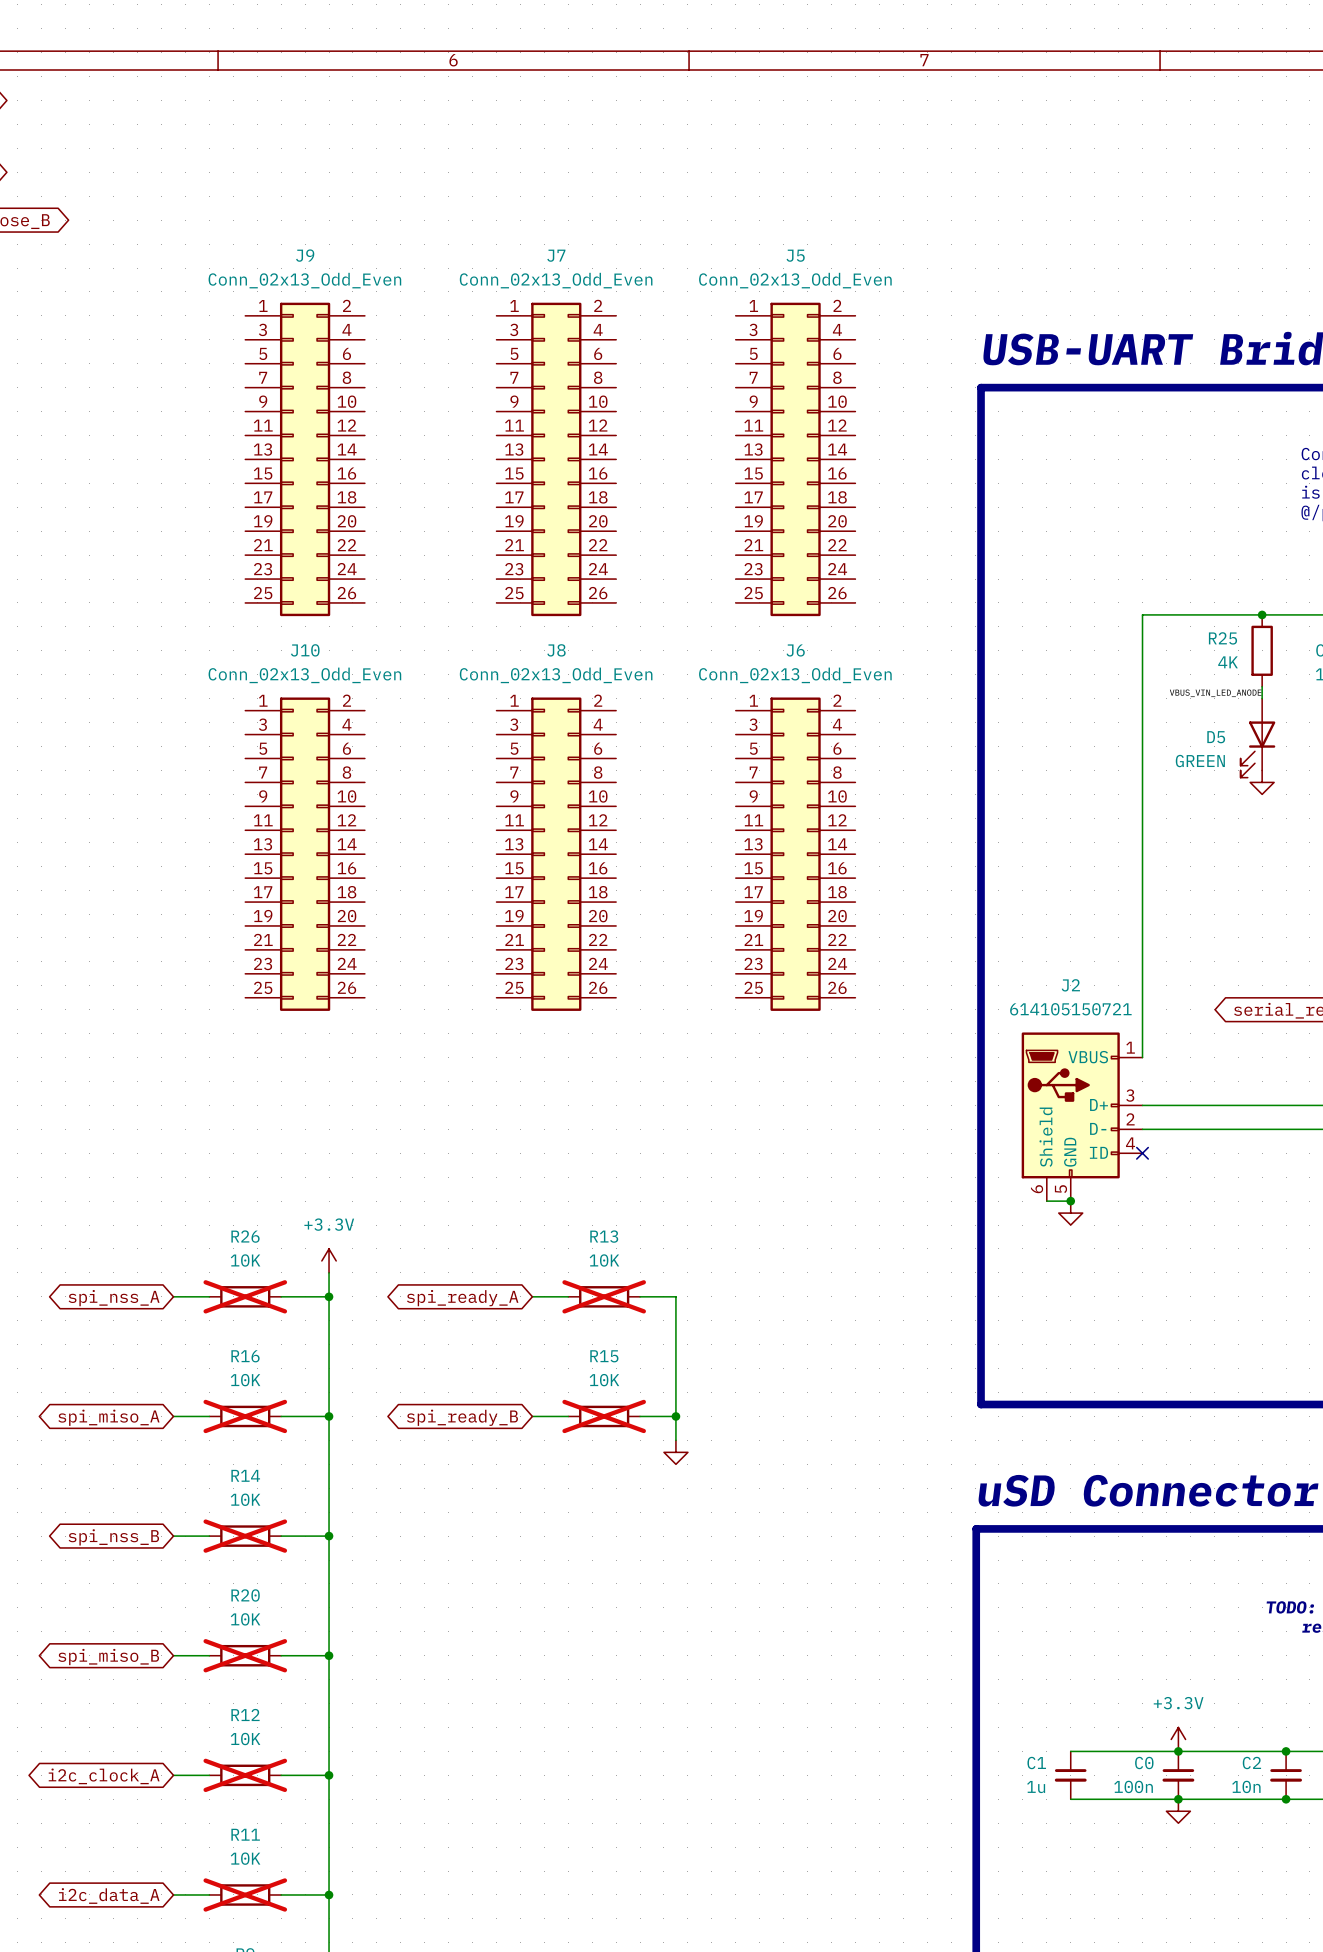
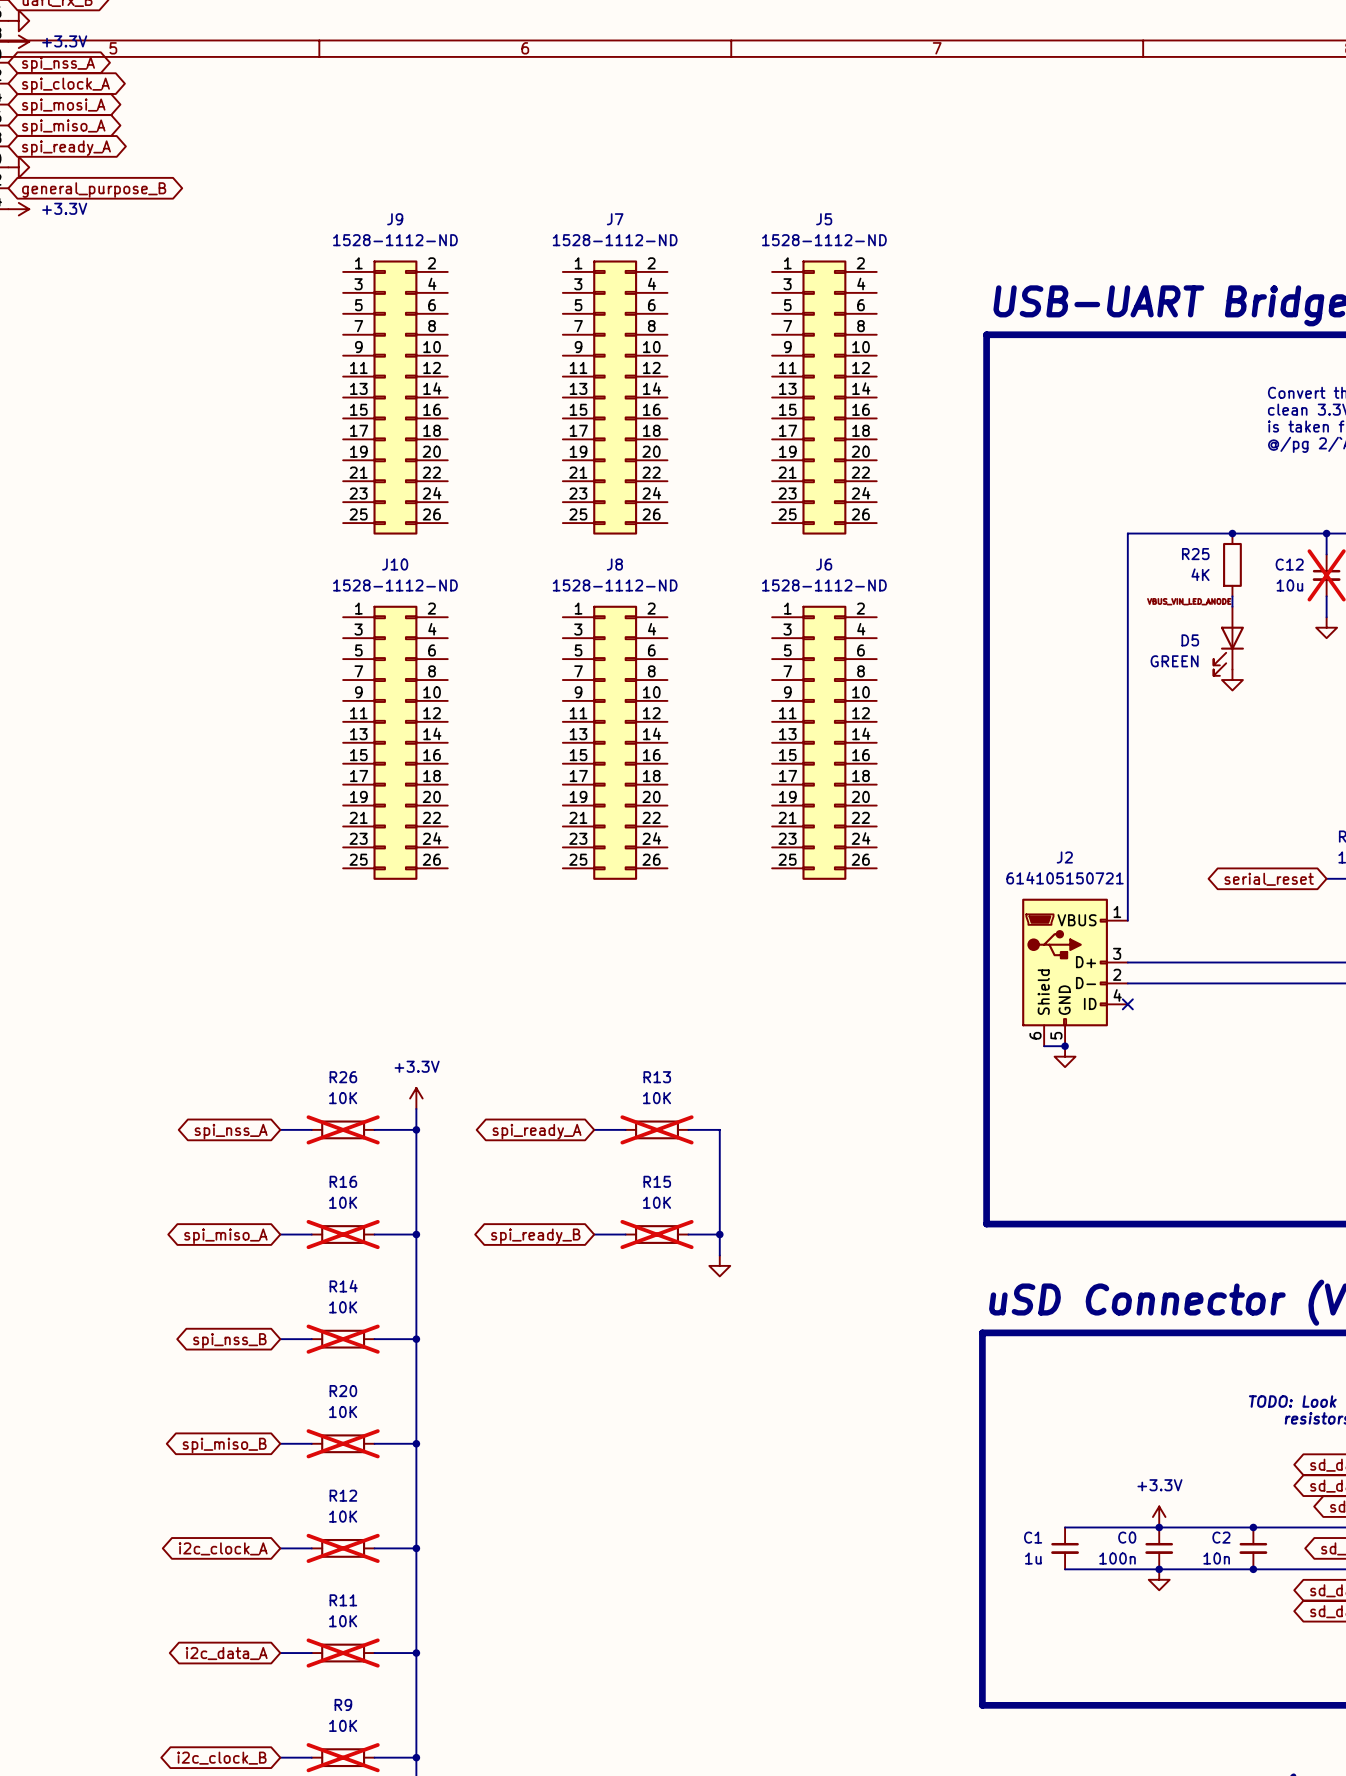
J9 value: Conn_02x13_Odd_Even (304, 280) -> 1528-1112-ND (395, 240)
J7 value: Conn_02x13_Odd_Even (556, 280) -> 1528-1112-ND (615, 240)
J5 value: Conn_02x13_Odd_Even (795, 280) -> 1528-1112-ND (824, 240)
J10 value: Conn_02x13_Odd_Even (304, 675) -> 1528-1112-ND (395, 585)
J8 value: Conn_02x13_Odd_Even (556, 675) -> 1528-1112-ND (615, 585)
J6 value: Conn_02x13_Odd_Even (795, 675) -> 1528-1112-ND (824, 585)

